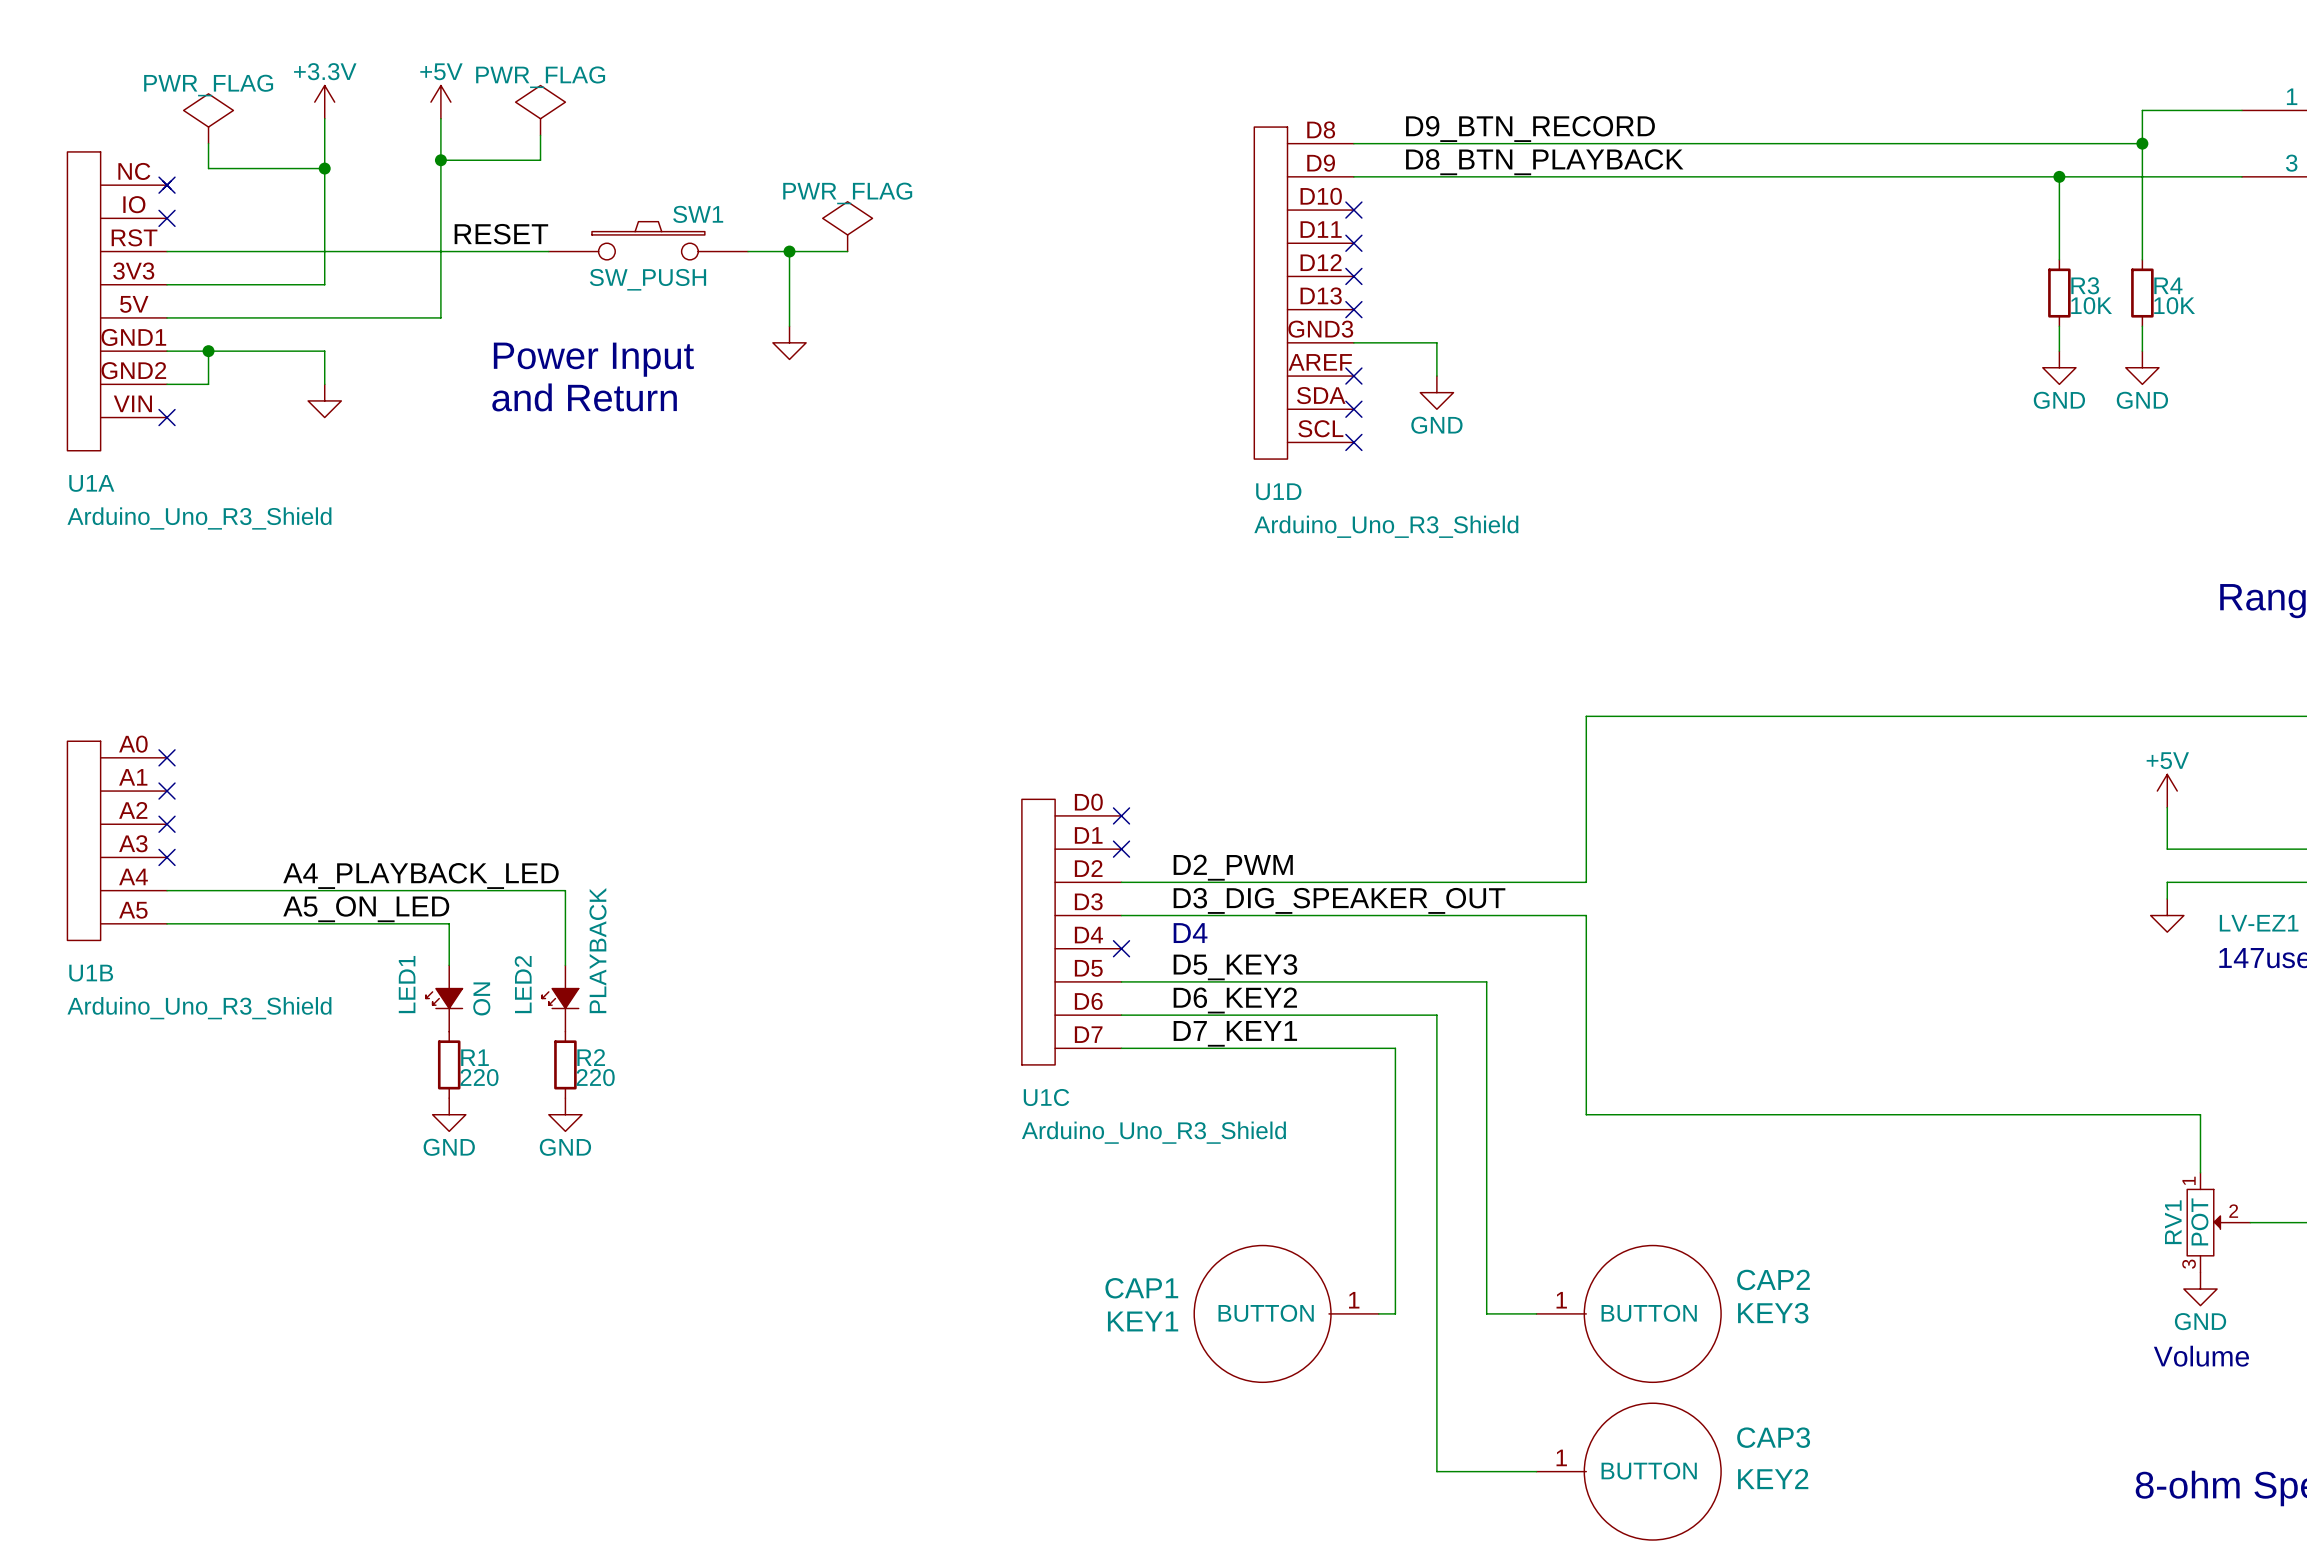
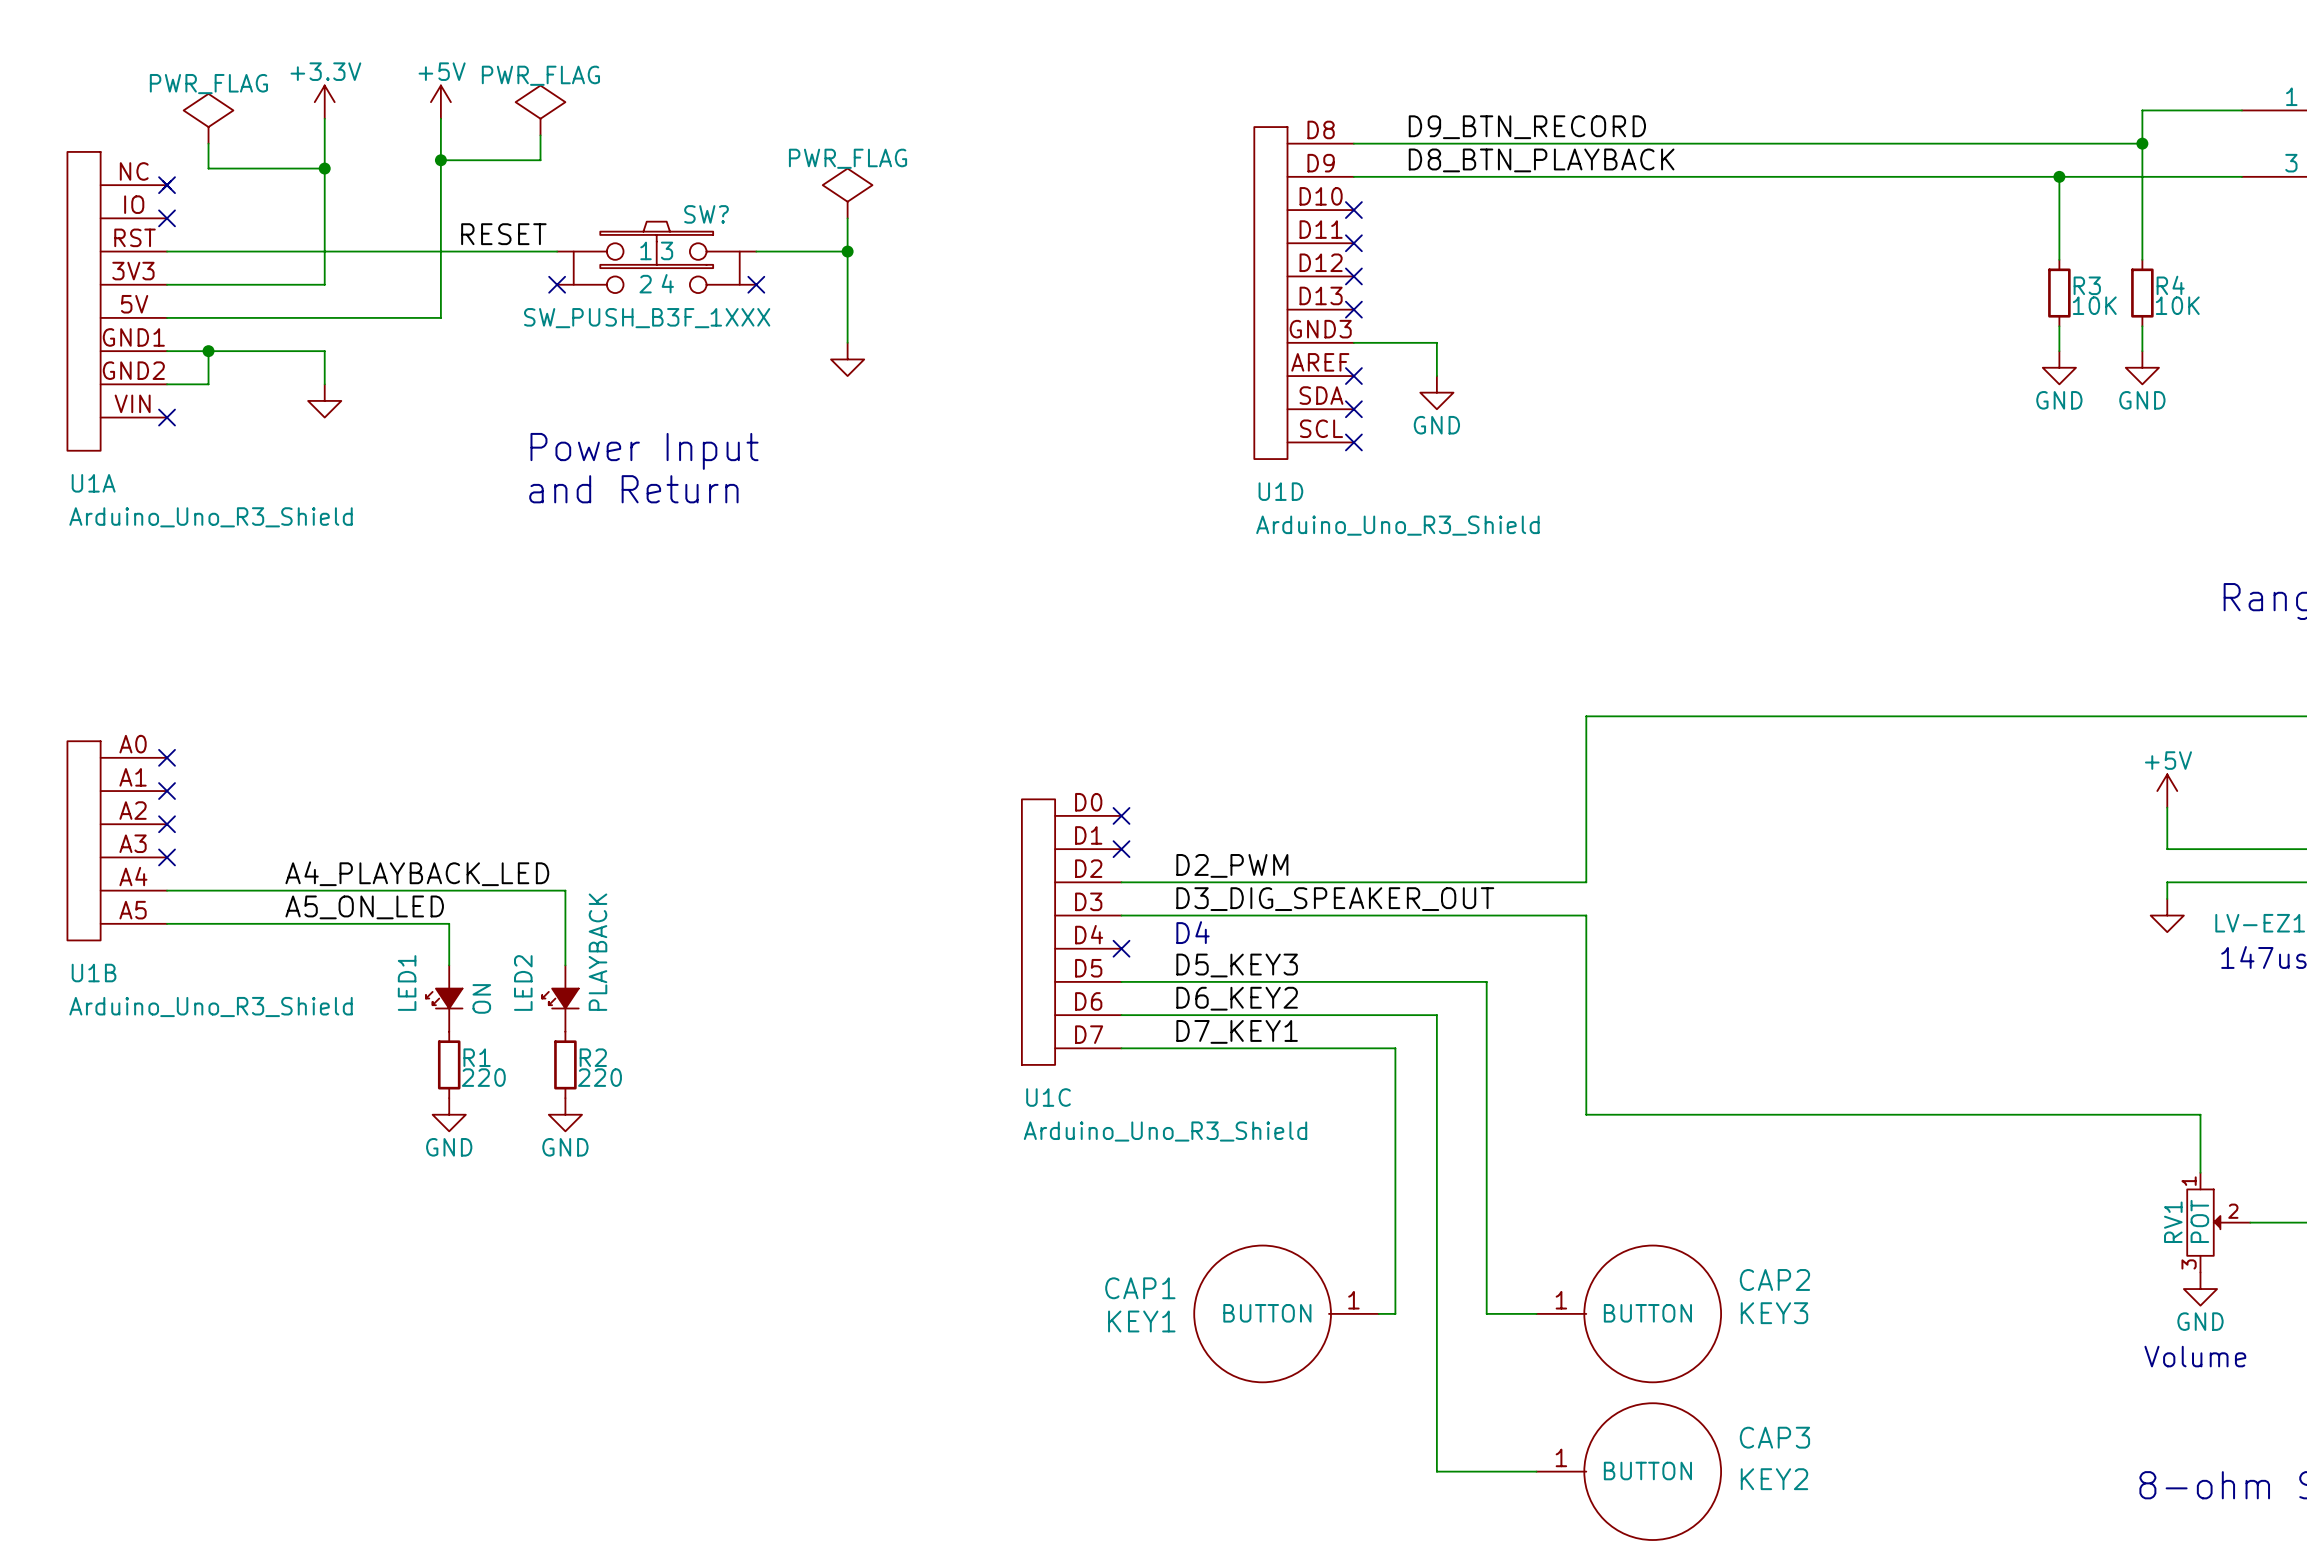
wire: none -> (847, 218) (847, 342)
power symbol position: PWR_FLAG (847, 226) -> PWR_FLAG (847, 193)
SW1: SW_PUSH (648, 240) -> none
wire: (789, 251) (789, 326) -> none
junction position: (789, 251) -> (847, 251)
SW?: none -> SW_PUSH_B3F_1XXX (656, 257)
no-connect mark: none -> (557, 284)
no-connect mark: none -> (756, 284)
power symbol position: (789, 342) -> (847, 359)
text position: Power Input (593, 359) -> Power Input (644, 451)
text position: and Return (584, 397) -> and Return (633, 489)

